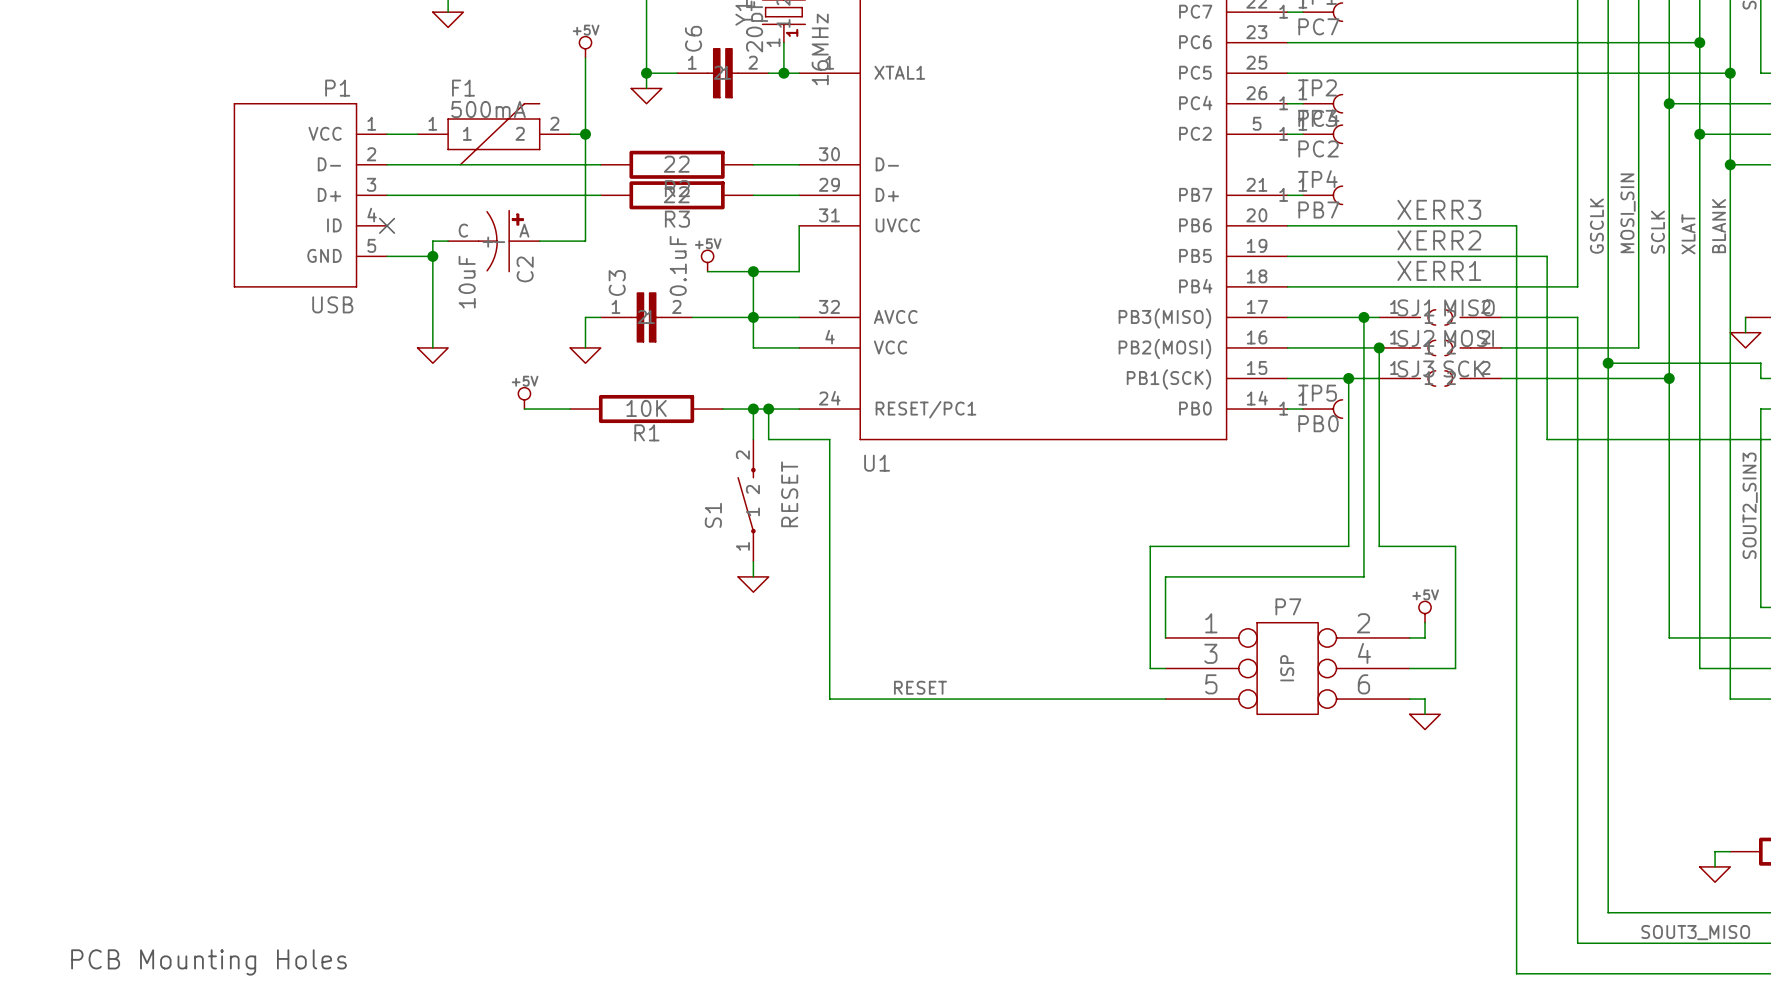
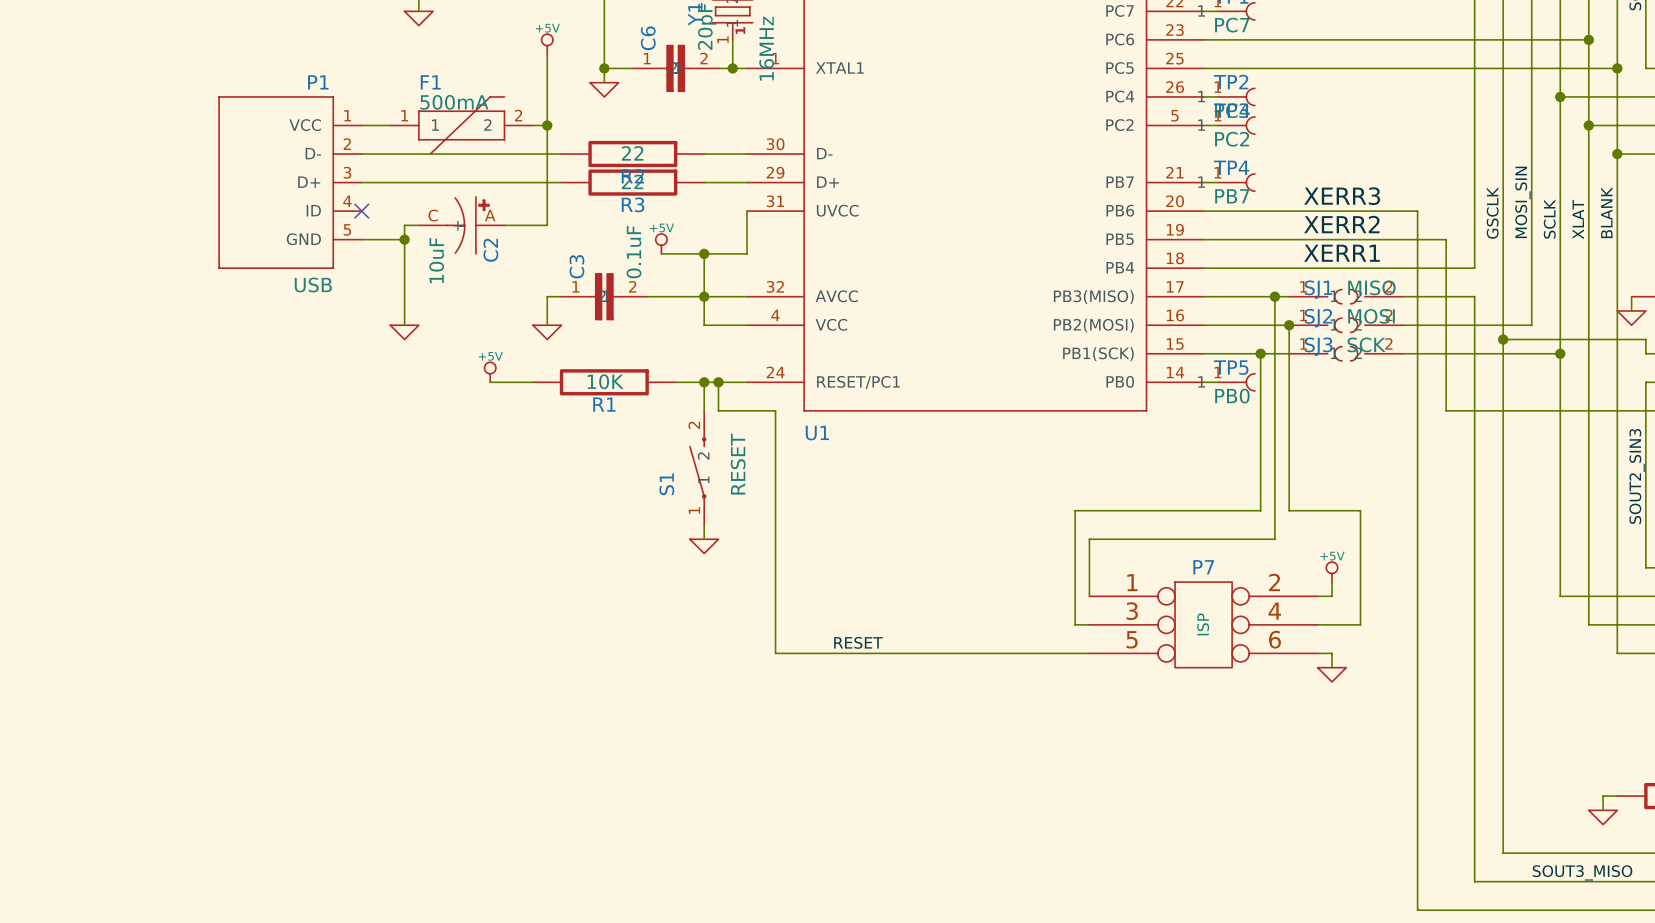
text: PCB Mounting Holes (209, 962) -> none

